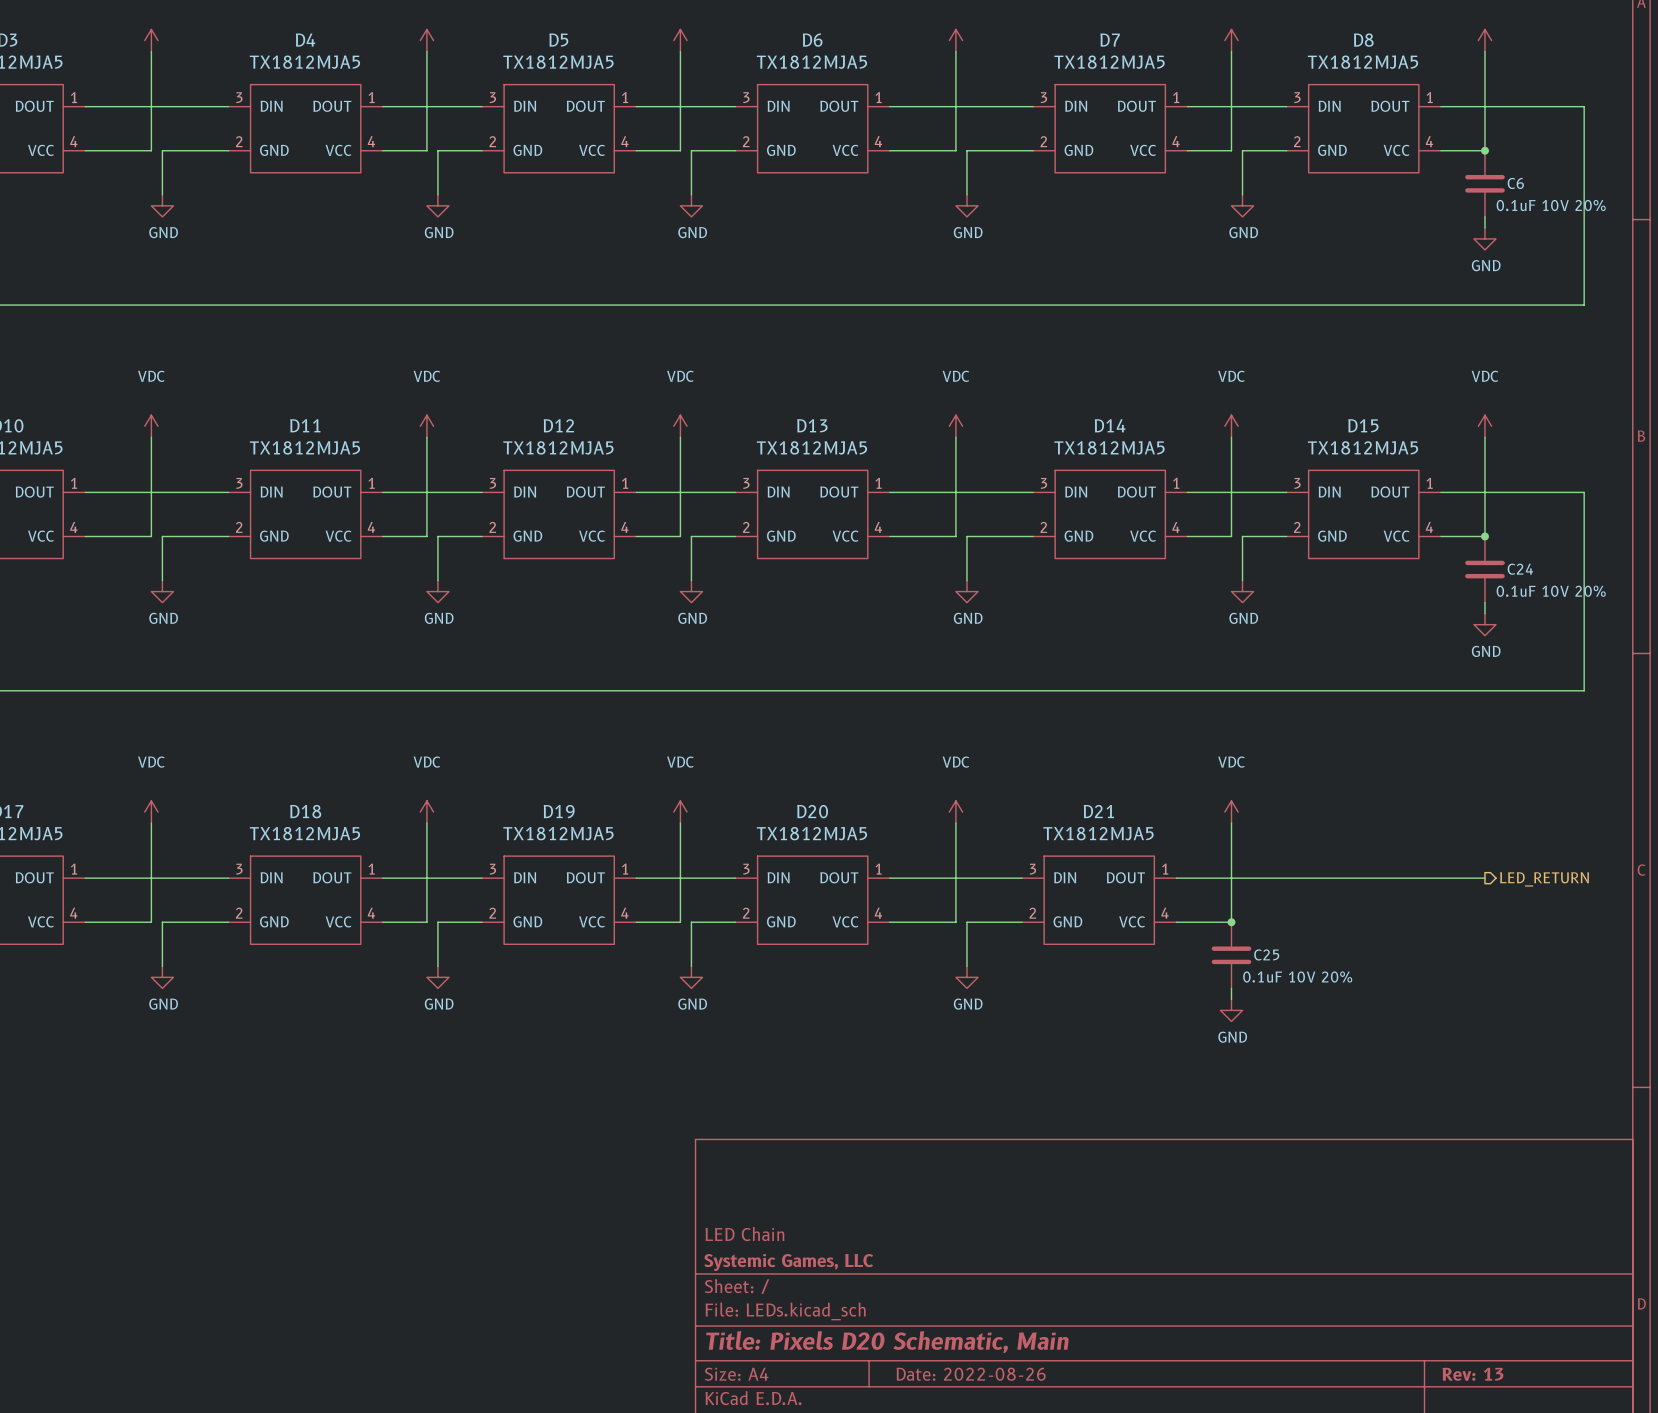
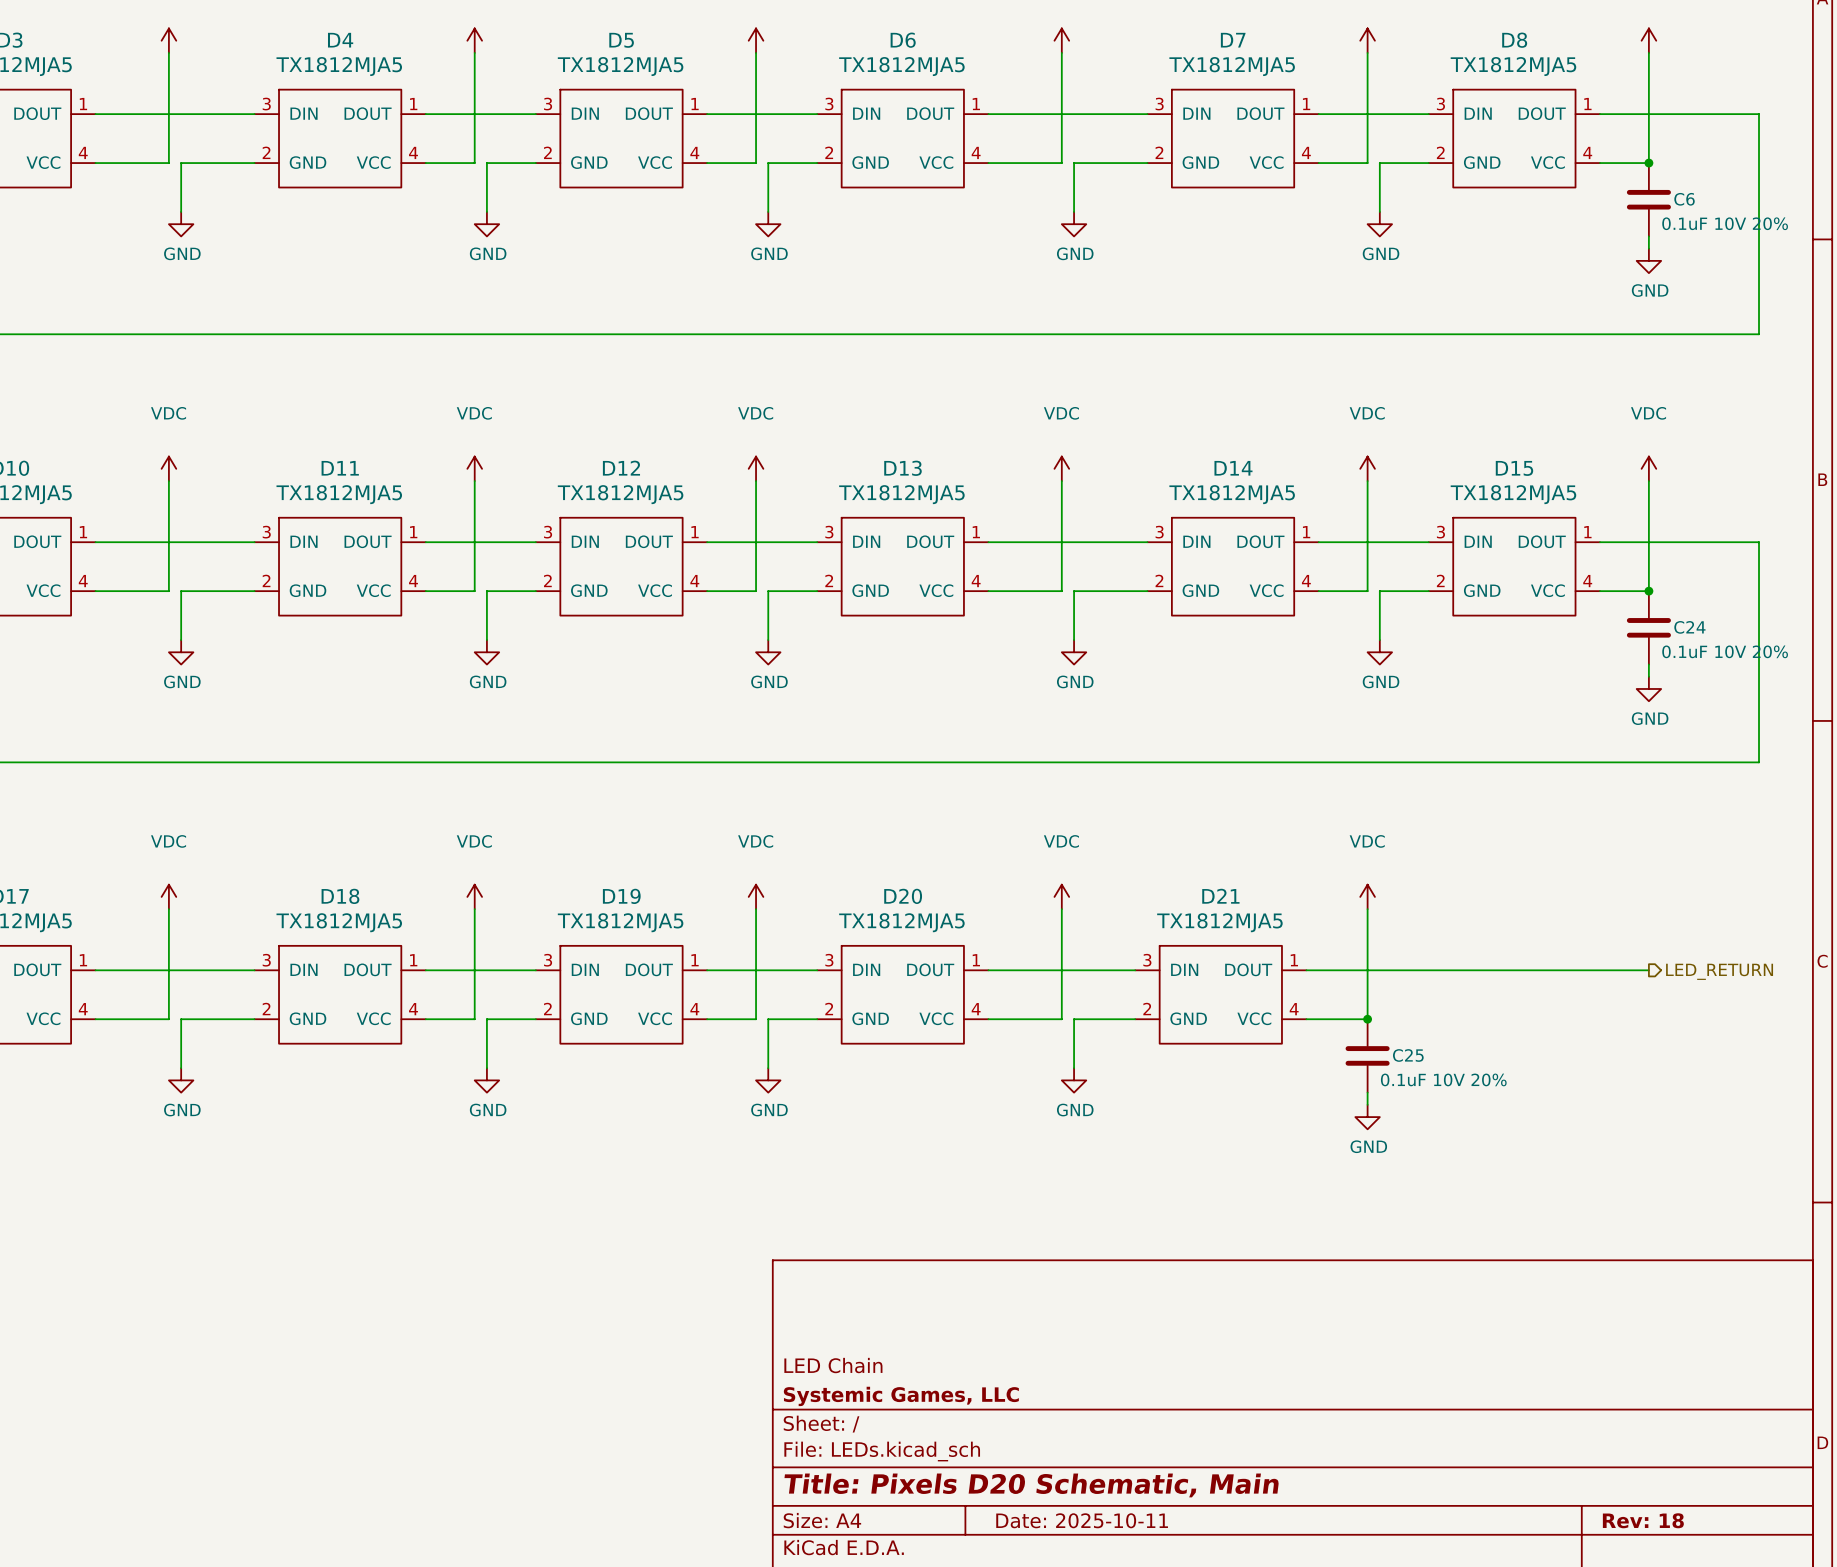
title block: Date: 2022-08-26 (971, 1374) -> Date: 2025-10-11 (1082, 1520)
title block: Rev: 13 (1472, 1374) -> Rev: 18 (1643, 1520)

